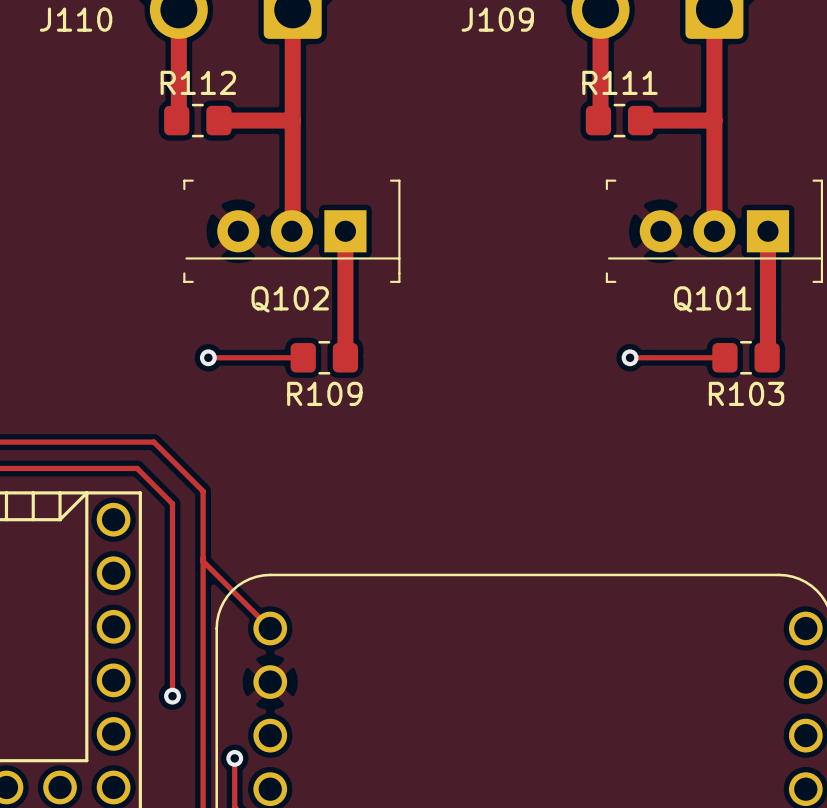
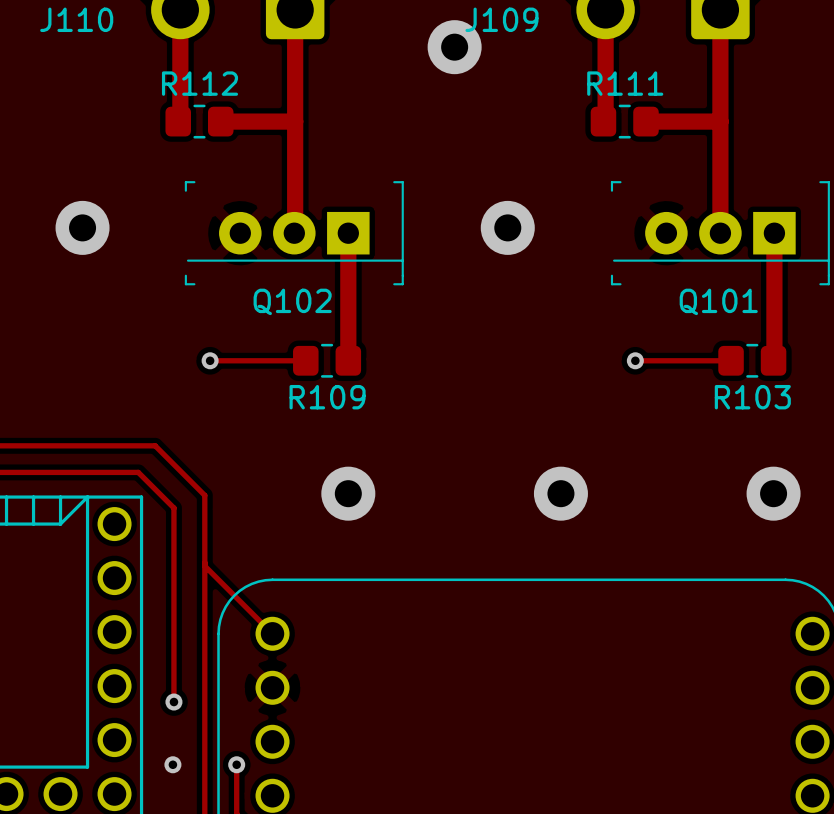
via: none -> (454, 47)
via: none -> (82, 227)
via: none -> (507, 227)
via: none -> (348, 493)
via: none -> (560, 493)
via: none -> (773, 493)
via: none -> (172, 764)

